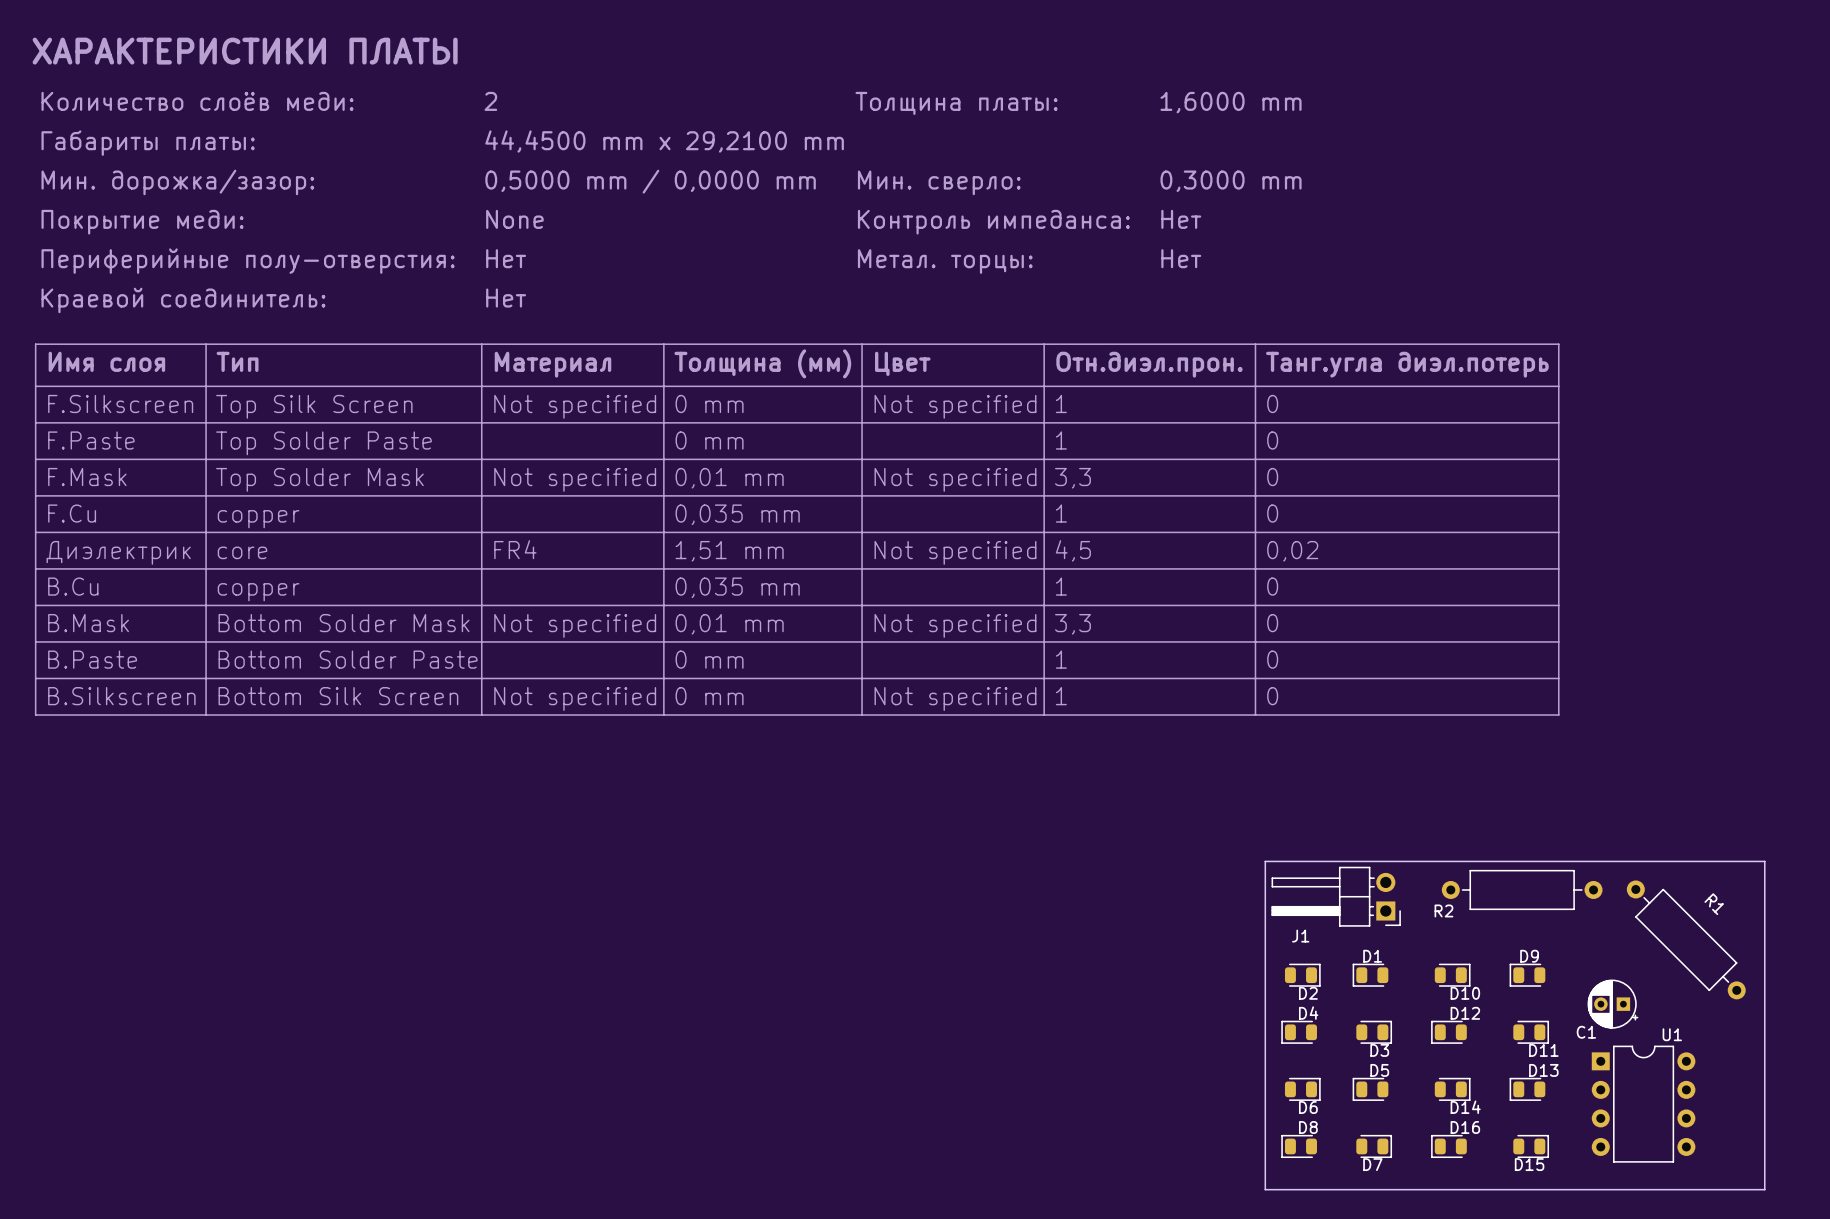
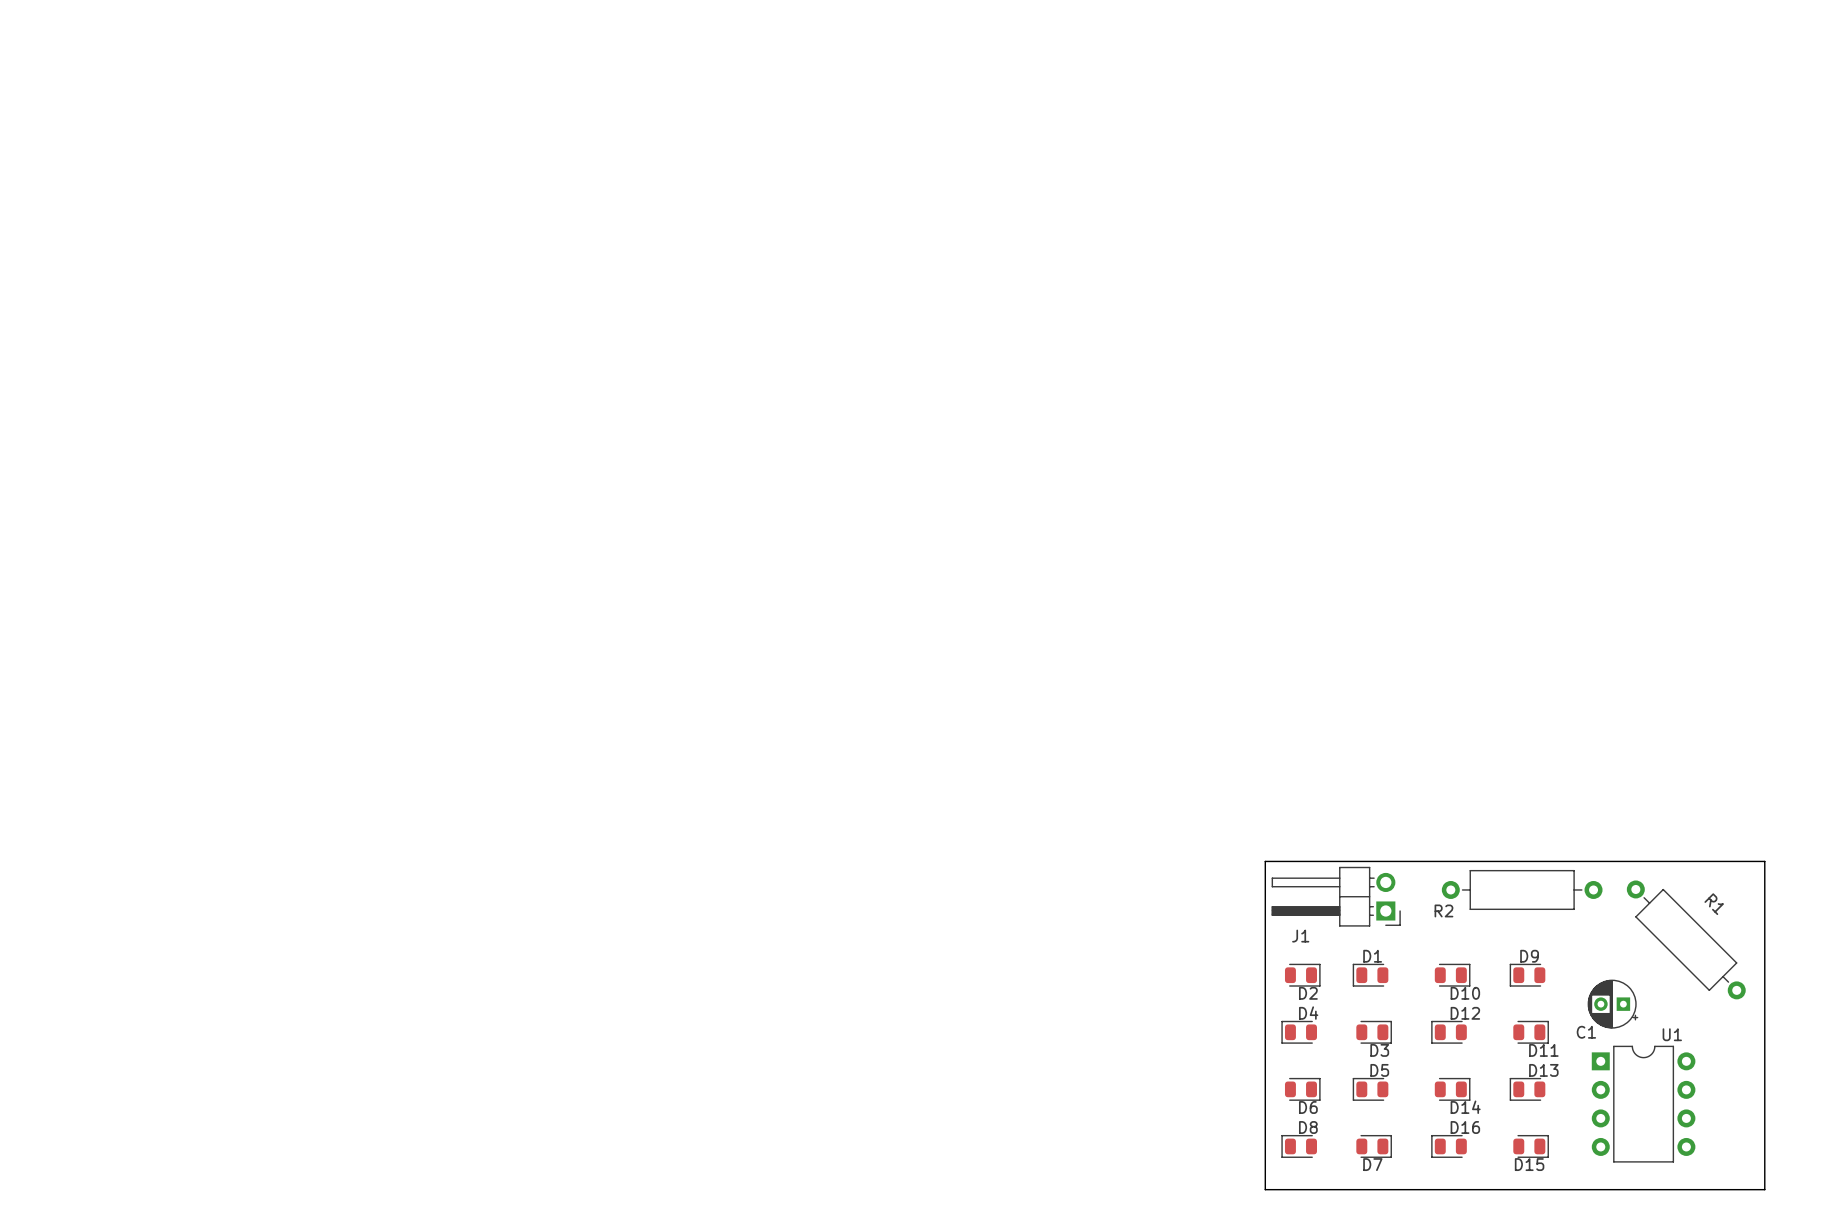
text: ХАРАКТЕРИСТИКИ ПЛАТЫ (245, 51) -> none
text: Количество слоёв меди: (197, 101) -> none
text: 2 (490, 101) -> none
text: 1,6000 mm (1231, 102) -> none
text: Толщина платы: (956, 103) -> none
text: 44,4500 mm x 29,2100 mm (664, 141) -> none
text: Габариты платы: (148, 143) -> none
text: 0,5000 mm / 0,0000 mm (650, 181) -> none
text: 0,3000 mm (1231, 181) -> none
text: Мин. дорожка/зазор: (177, 182) -> none
text: Мин. сверло: (939, 182) -> none
text: None (514, 219) -> none
text: Нет (1181, 219) -> none
text: Покрытие меди: (142, 222) -> none
text: Контроль импеданса: (993, 222) -> none
text: Нет (506, 258) -> none
text: Нет (1181, 258) -> none
text: Периферийные полу-отверстия: (248, 261) -> none
text: Метал. торцы: (945, 261) -> none
text: Нет (506, 298) -> none
text: Краевой соединитель: (183, 300) -> none
line: (35, 344) (1558, 344) (1558, 715) (35, 715) (35, 344) -> none
line: (206, 344) (206, 715) -> none
line: (481, 344) (481, 715) -> none
line: (663, 344) (663, 715) -> none
line: (862, 344) (862, 715) -> none
line: (1044, 344) (1044, 715) -> none
line: (1255, 344) (1255, 715) -> none
text: Имя слоя (106, 361) -> none
text: Тип (237, 361) -> none
text: Толщина (мм) (762, 363) -> none
text: Цвет (902, 363) -> none
text: Материал (552, 364) -> none
text: Отн.диэл.прон. (1149, 364) -> none
text: Танг.угла диэл.потерь (1407, 364) -> none
line: (35, 386) (1558, 386) -> none
text: F.Silkscreen (120, 403) -> none
text: 0 mm (709, 403) -> none
text: 1 (1061, 403) -> none
text: 0 (1272, 403) -> none
text: Top Silk Screen (314, 406) -> none
text: Not specified (575, 406) -> none
text: Not specified (955, 406) -> none
line: (35, 422) (1558, 422) -> none
text: F.Paste (91, 440) -> none
text: 0 mm (709, 440) -> none
text: 1 (1061, 440) -> none
text: 0 (1272, 440) -> none
text: Top Solder Paste (323, 443) -> none
line: (35, 459) (1558, 459) -> none
text: F.Mask (87, 477) -> none
text: 0 (1272, 477) -> none
text: 0,01 mm (729, 478) -> none
text: 3,3 (1072, 478) -> none
text: Top Solder Mask (319, 479) -> none
text: Not specified (575, 479) -> none
text: Not specified (955, 479) -> none
line: (35, 495) (1558, 495) -> none
text: F.Cu (72, 513) -> none
text: 1 (1061, 513) -> none
text: 0 (1272, 513) -> none
text: 0,035 mm (737, 514) -> none
text: copper (258, 519) -> none
line: (35, 532) (1558, 532) -> none
text: FR4 (515, 549) -> none
text: 4,5 (1073, 550) -> none
text: 1,51 mm (729, 551) -> none
text: 0,02 (1292, 551) -> none
text: Диэлектрик (118, 552) -> none
text: core (242, 552) -> none
text: Not specified (955, 552) -> none
line: (35, 568) (1558, 568) -> none
text: B.Cu (73, 586) -> none
text: 1 (1061, 586) -> none
text: 0 (1272, 586) -> none
text: 0,035 mm (737, 587) -> none
text: copper (258, 592) -> none
line: (35, 605) (1558, 605) -> none
text: B.Mask (88, 623) -> none
text: Bottom Solder Mask (344, 623) -> none
text: 0 (1272, 623) -> none
text: 0,01 mm (729, 624) -> none
text: 3,3 (1072, 624) -> none
text: Not specified (575, 625) -> none
text: Not specified (955, 625) -> none
line: (35, 641) (1558, 641) -> none
text: B.Paste (92, 659) -> none
text: Bottom Solder Paste (348, 659) -> none
text: 0 mm (709, 659) -> none
text: 1 (1061, 659) -> none
text: 0 (1272, 659) -> none
line: (35, 678) (1558, 678) -> none
text: B.Silkscreen (121, 696) -> none
text: Bottom Silk Screen (338, 696) -> none
text: 0 mm (709, 696) -> none
text: 1 (1061, 696) -> none
text: 0 (1272, 696) -> none
text: Not specified (575, 698) -> none
text: Not specified (955, 698) -> none

